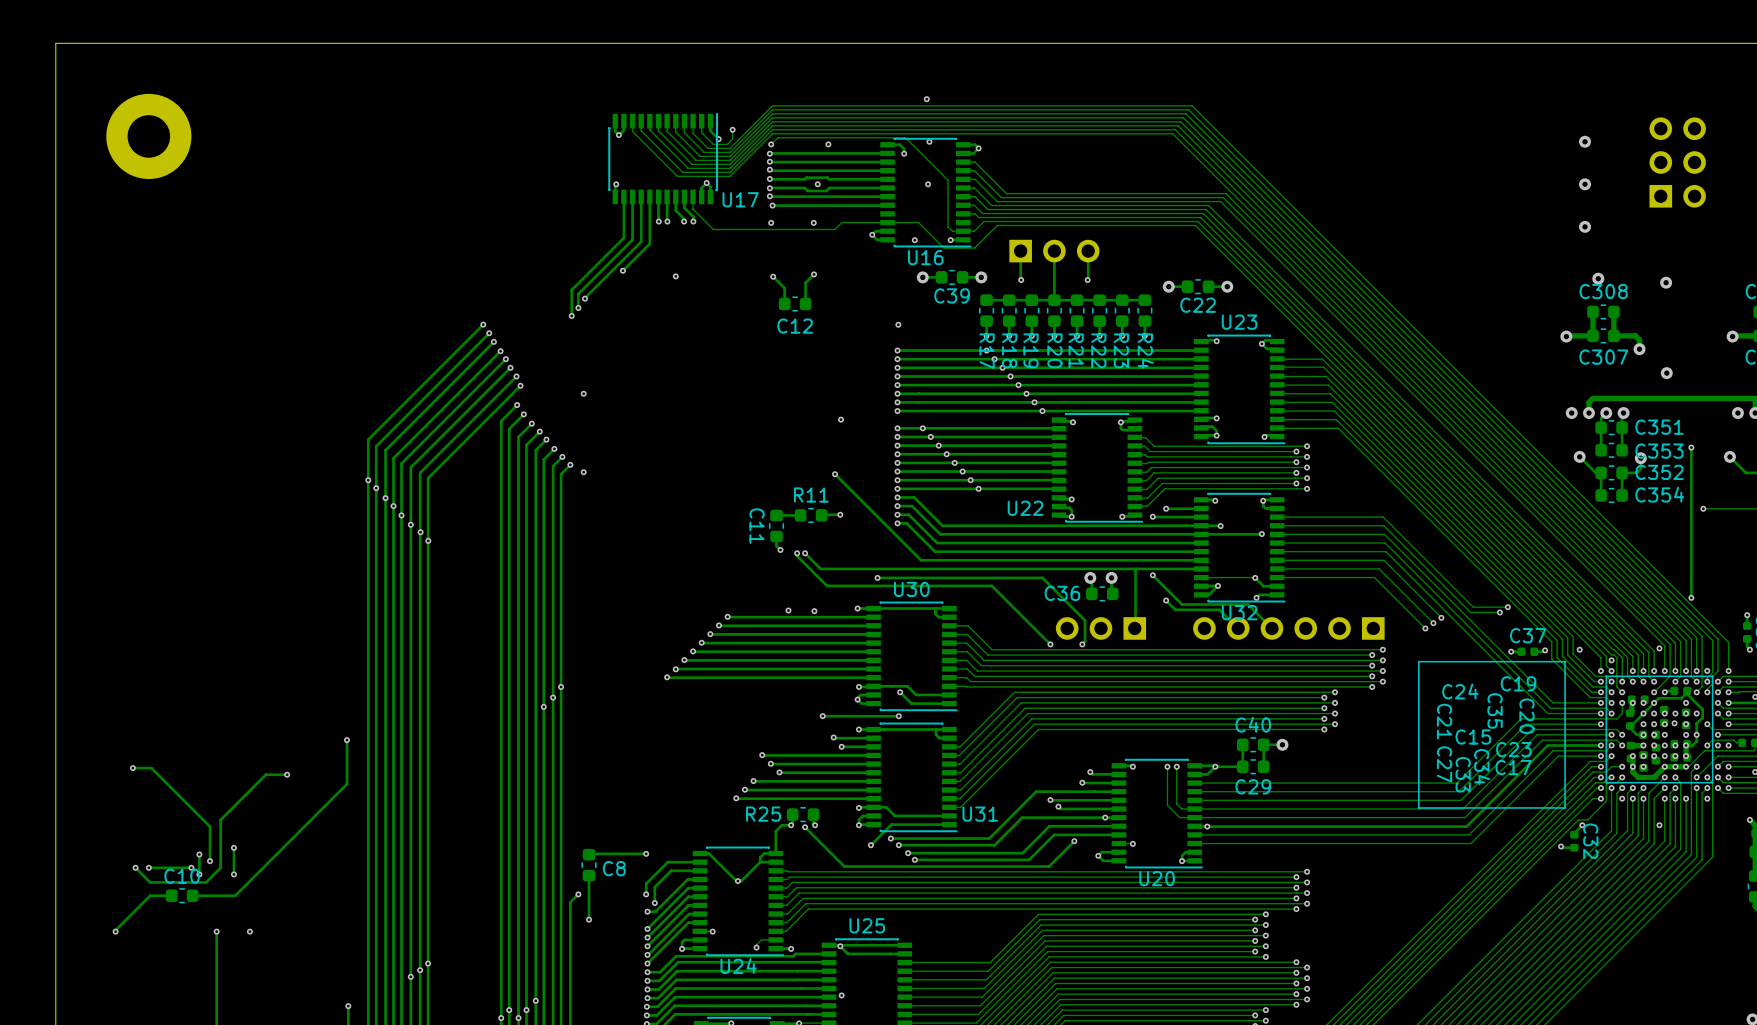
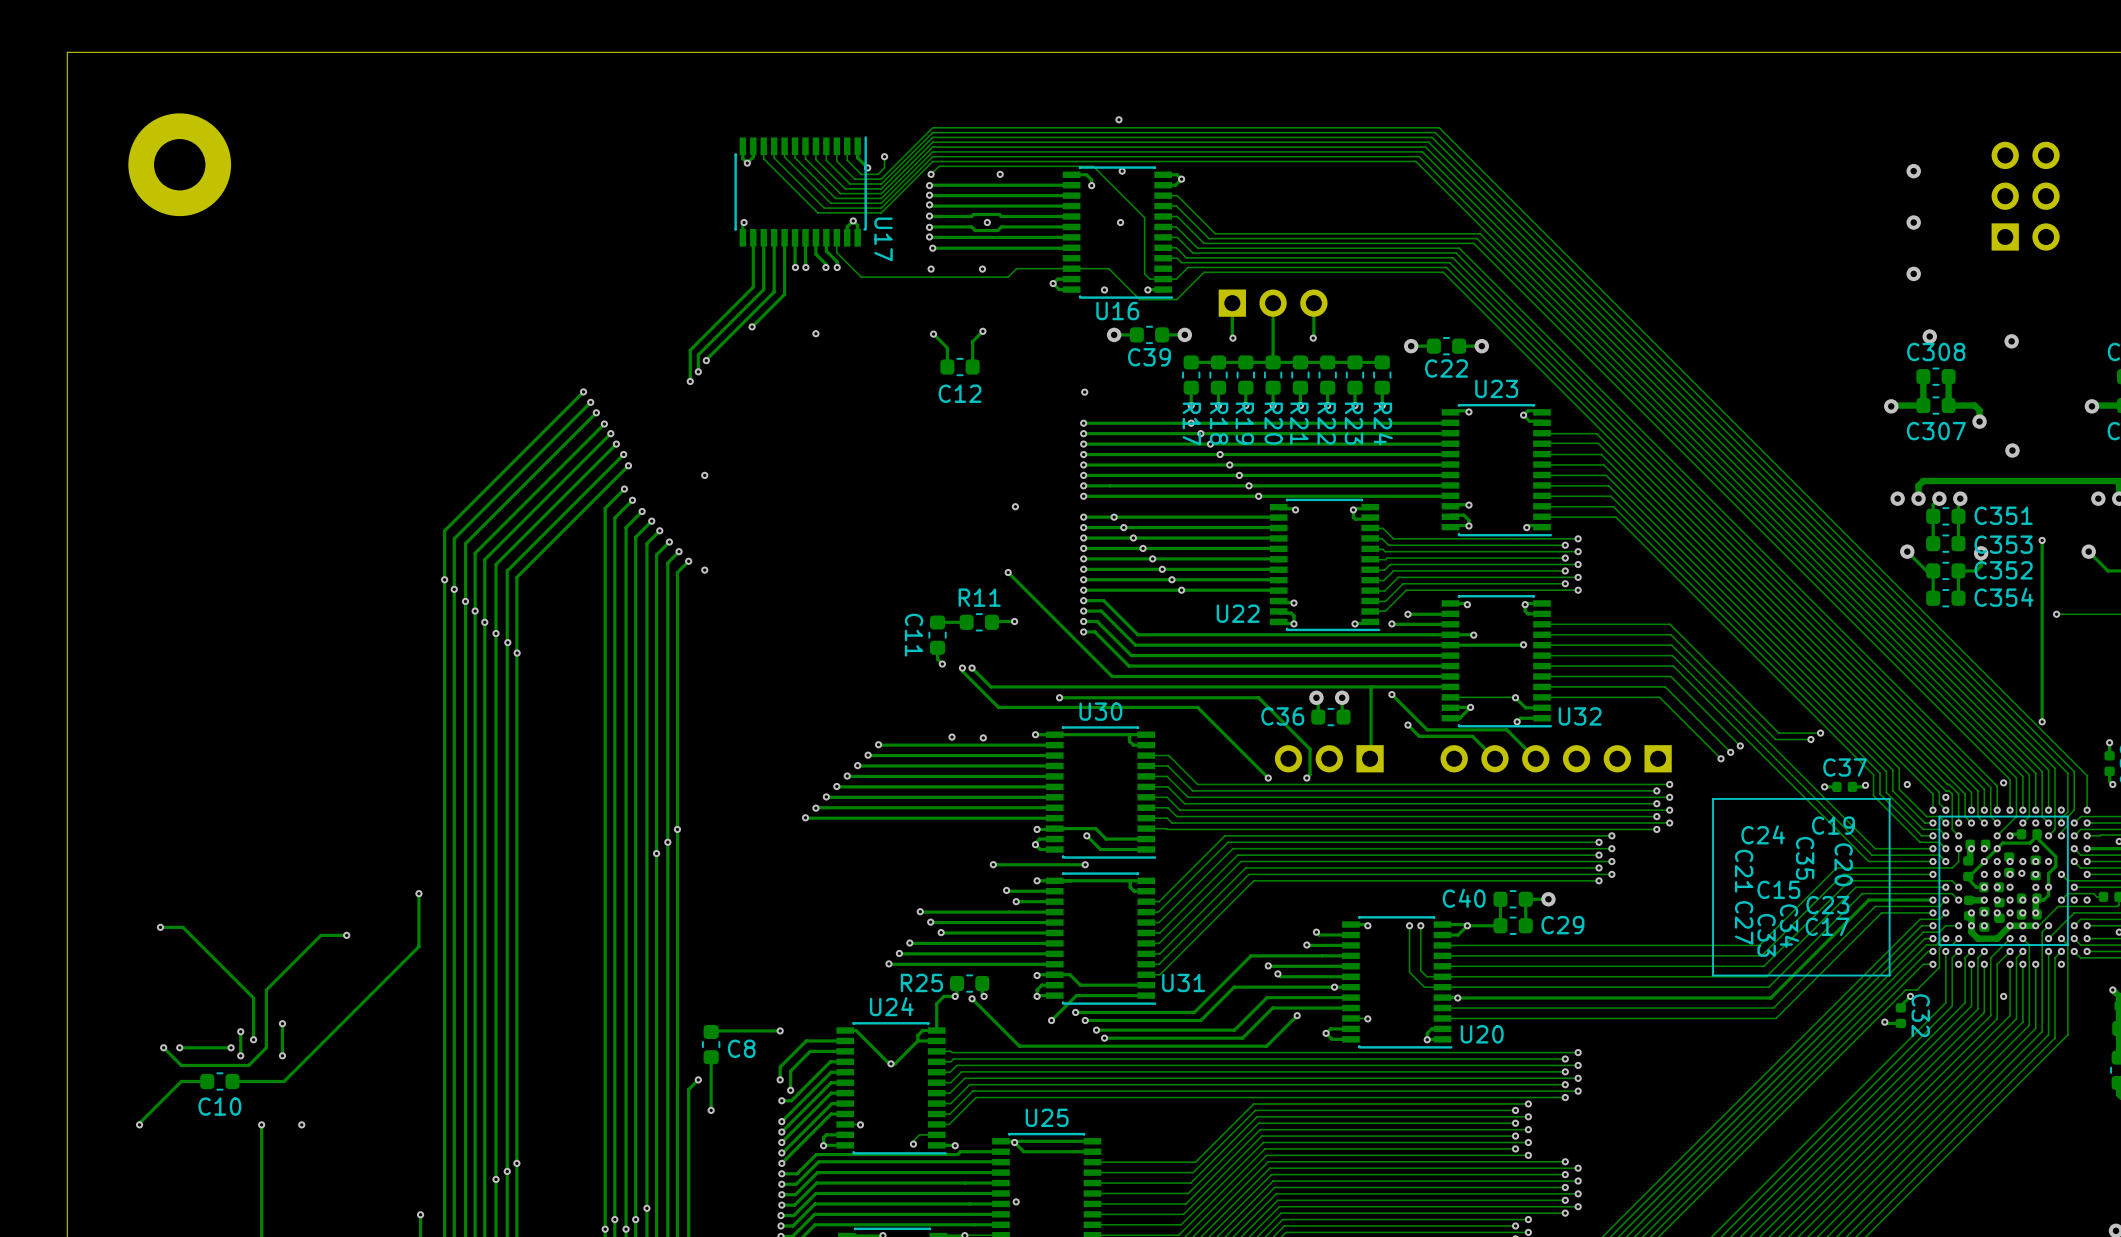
U17 name rotation: 0° (740, 199) -> 90° clockwise (883, 239)
U32 name position: U32 (1239, 612) -> U32 (1580, 716)
C40 name position: C40 (1253, 724) -> C40 (1464, 898)
C29 name position: C29 (1253, 786) -> C29 (1562, 925)
C10 name position: C10 (182, 876) -> C10 (219, 1106)
U20 name position: U20 (1157, 878) -> U20 (1482, 1034)
U24 name position: U24 (738, 966) -> U24 (891, 1006)

